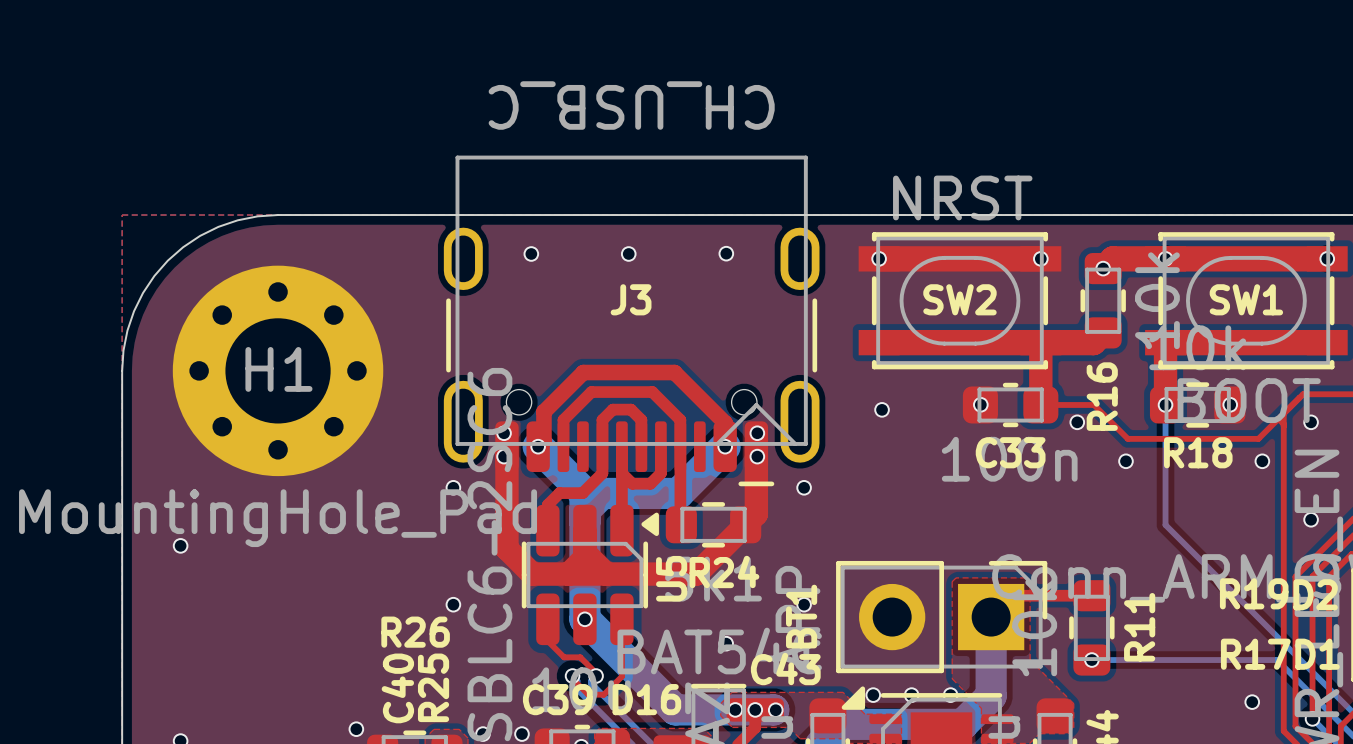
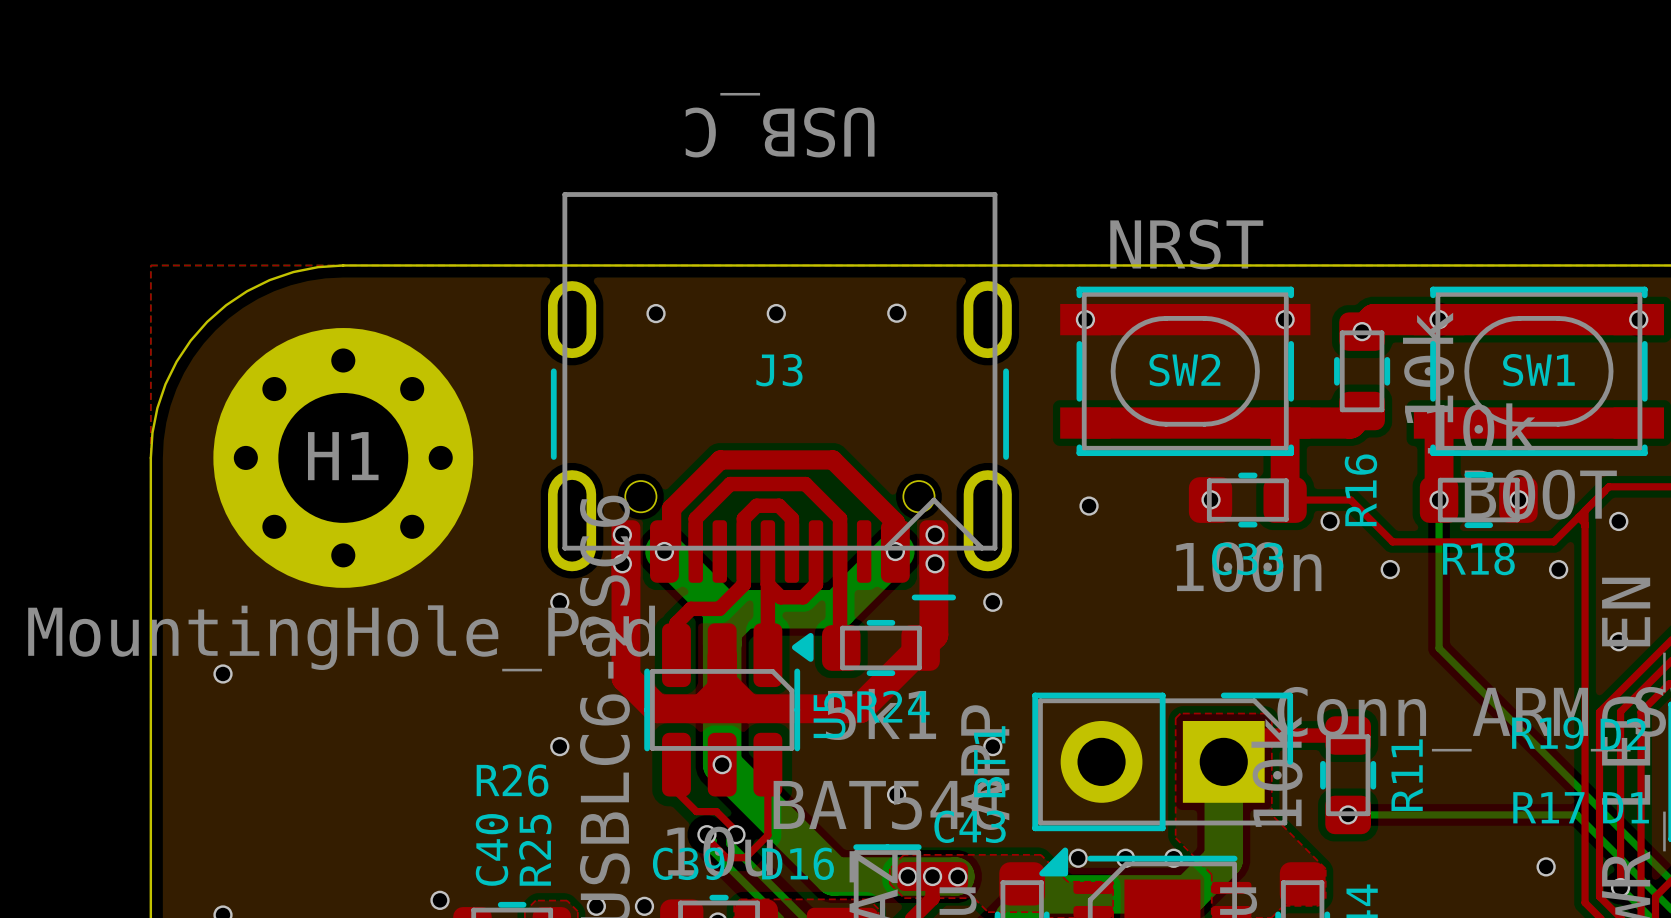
J3 value: CH_USB_C (631, 105) -> USB_C (780, 125)

